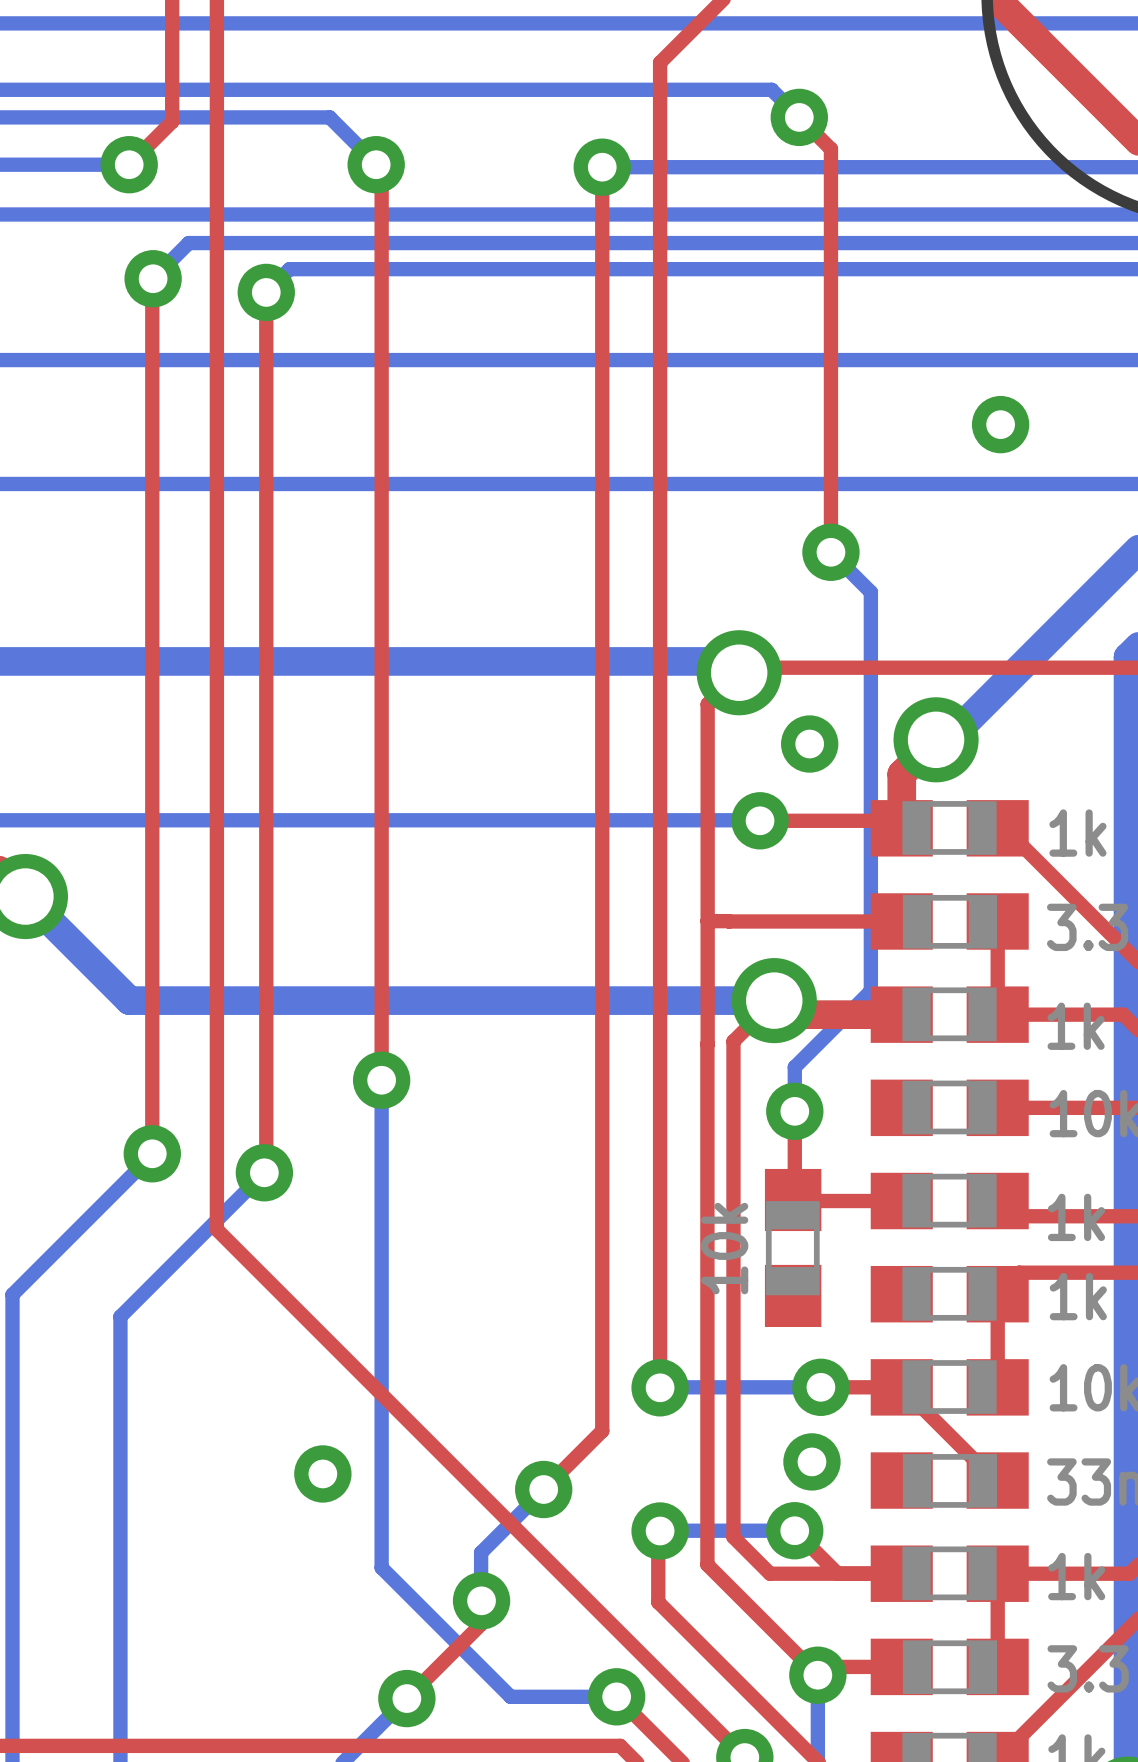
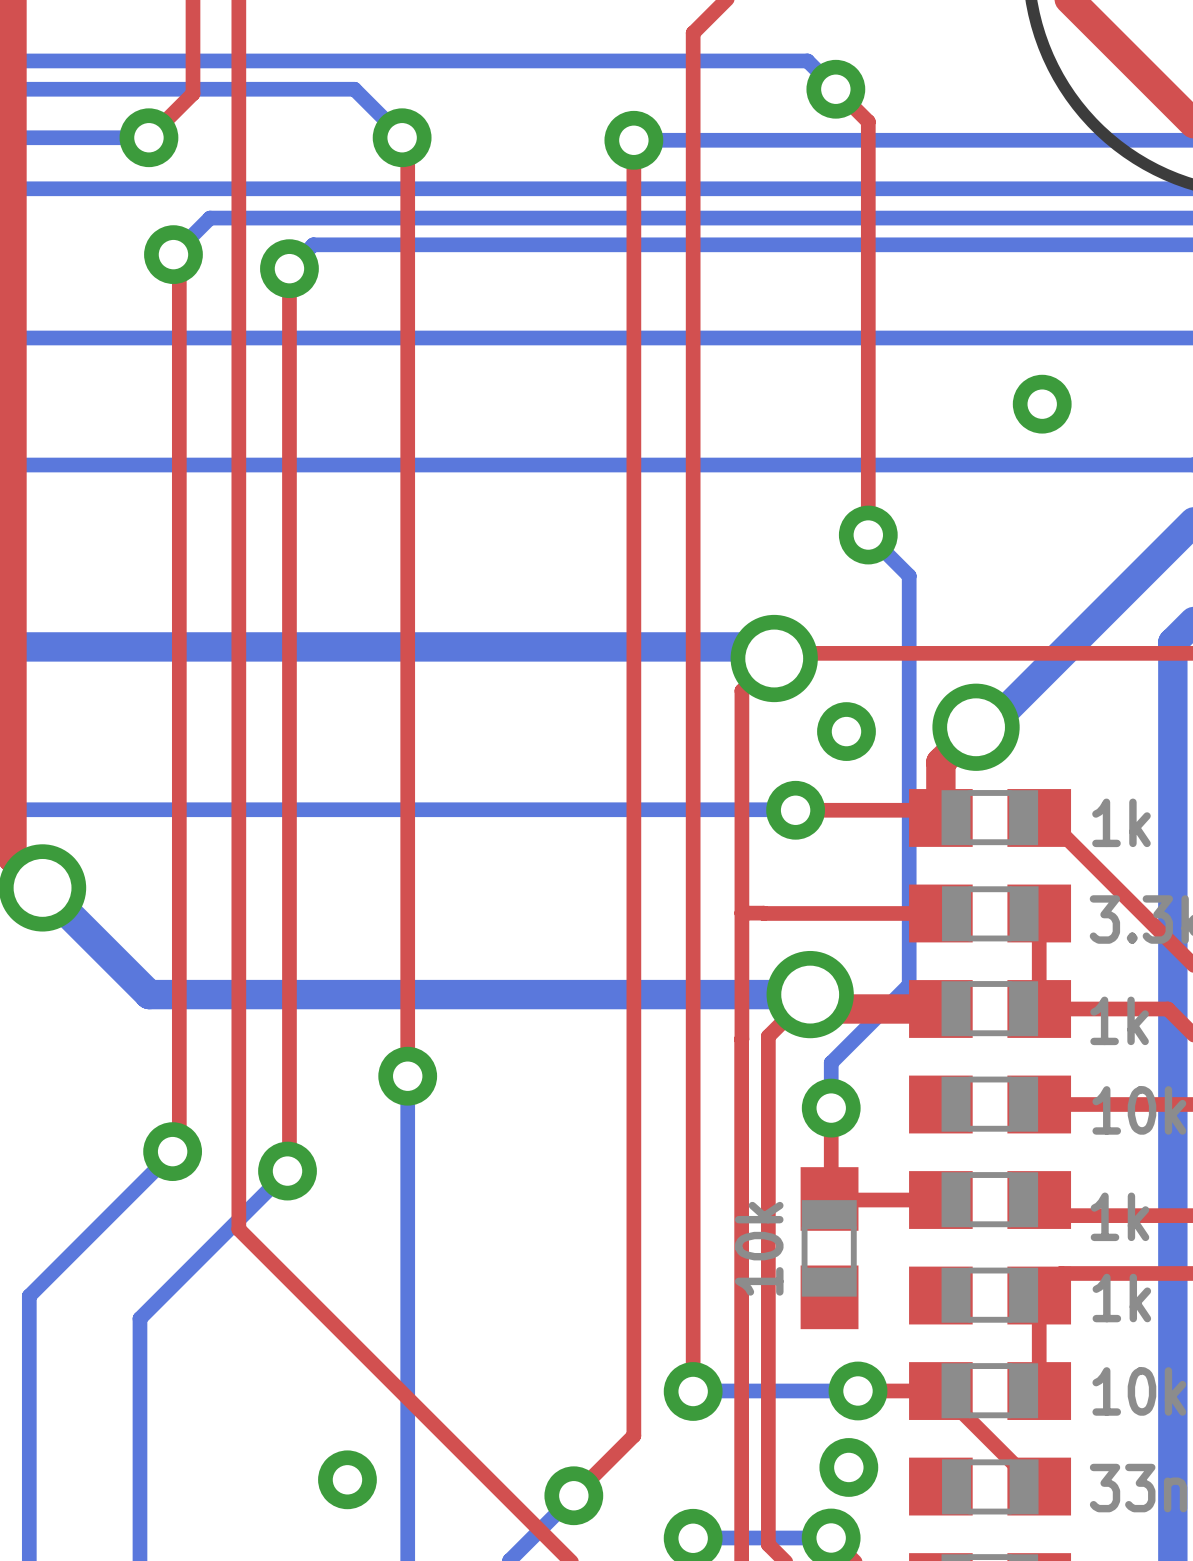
top track: none -> (169, 254) (179, 265) (179, 1149) (174, 1154)
top track: (153, 278) (152, 1153) -> none

